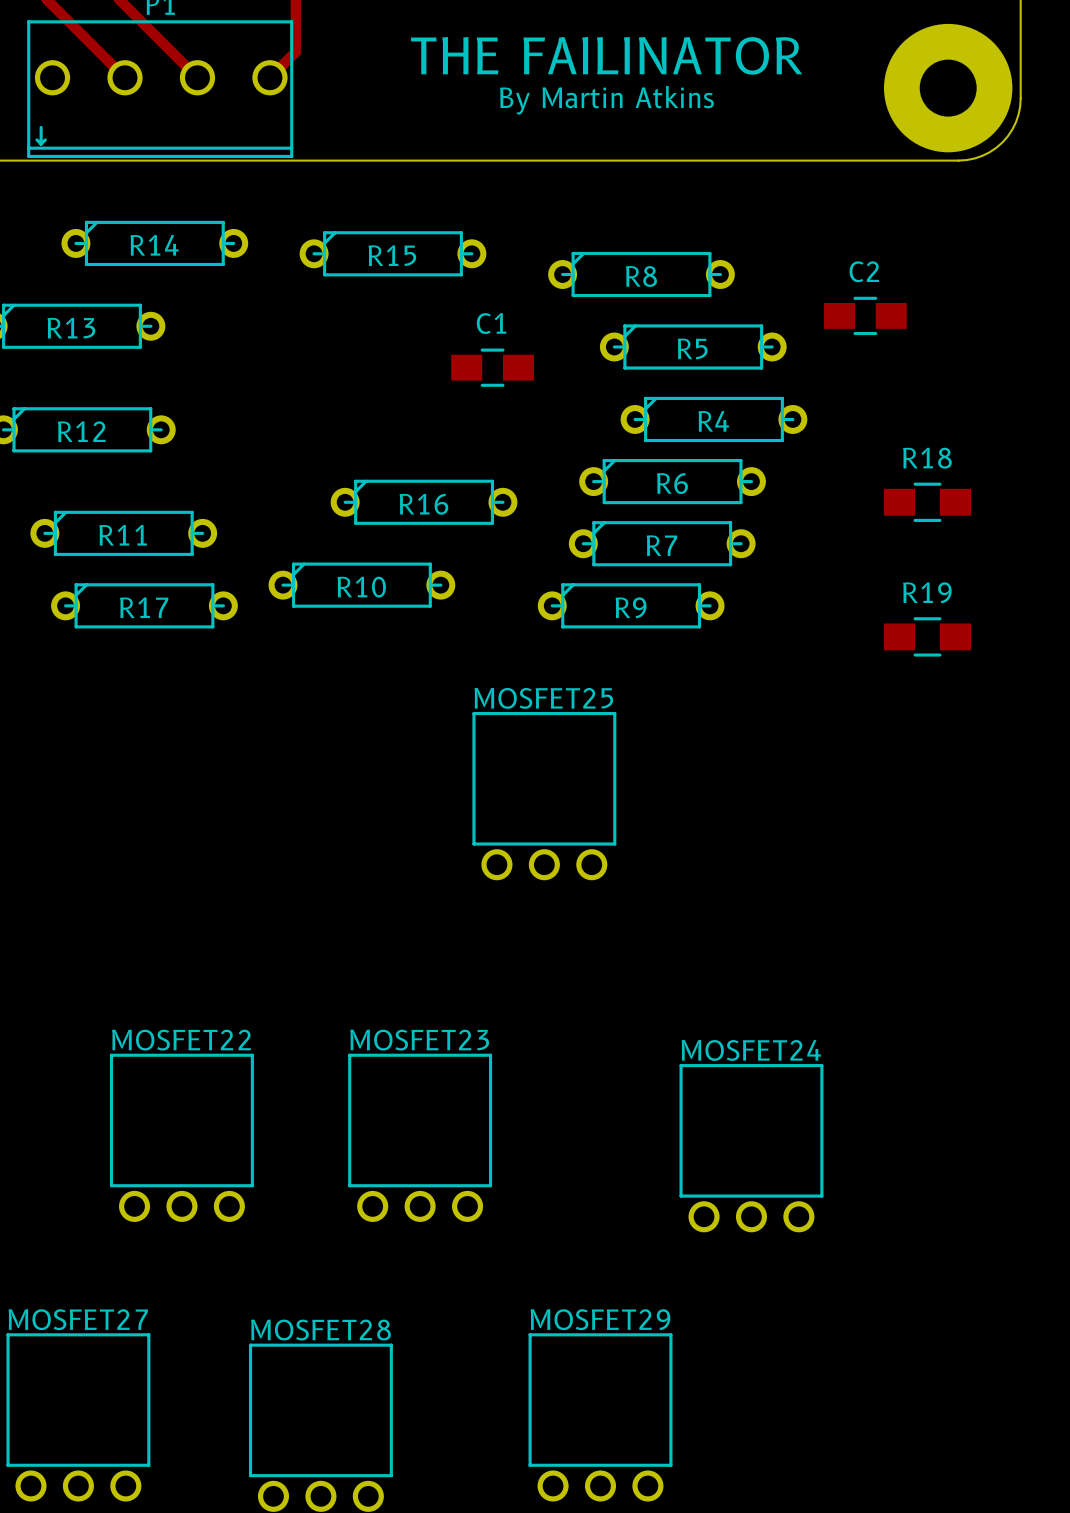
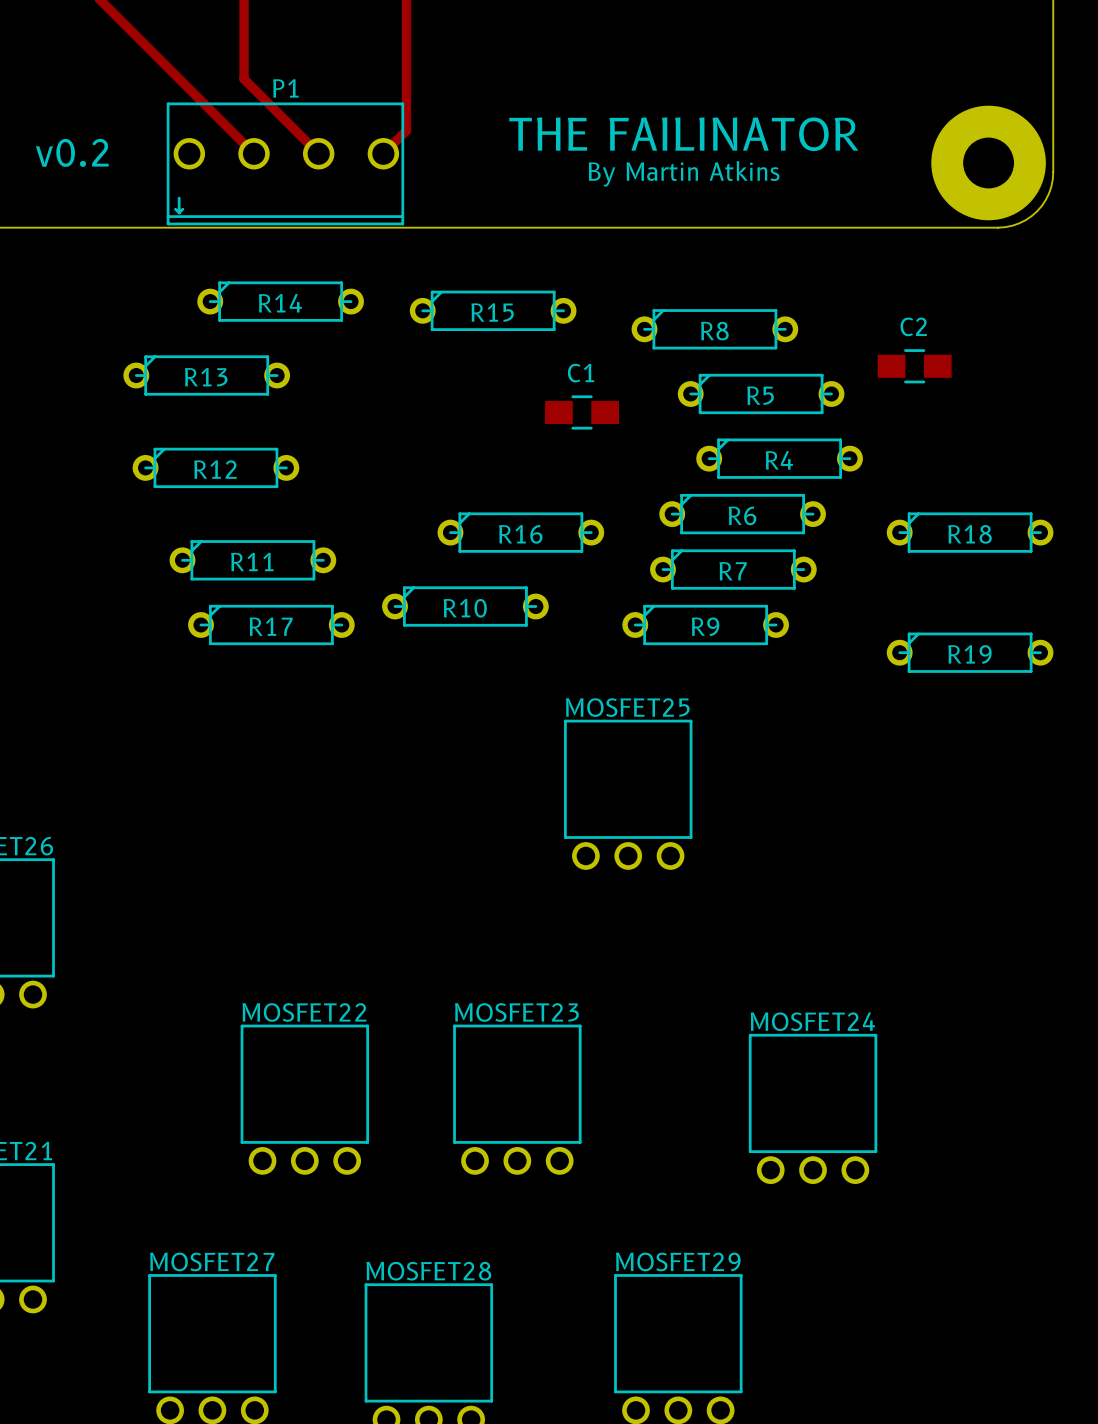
R18 name position: R18 (927, 458) -> R18 (970, 534)
R18 footprint: [884, 482, 971, 522] -> [886, 512, 1054, 553]
R19 name position: R19 (927, 592) -> R19 (969, 654)
R19 footprint: [884, 617, 971, 657] -> [886, 632, 1054, 673]

